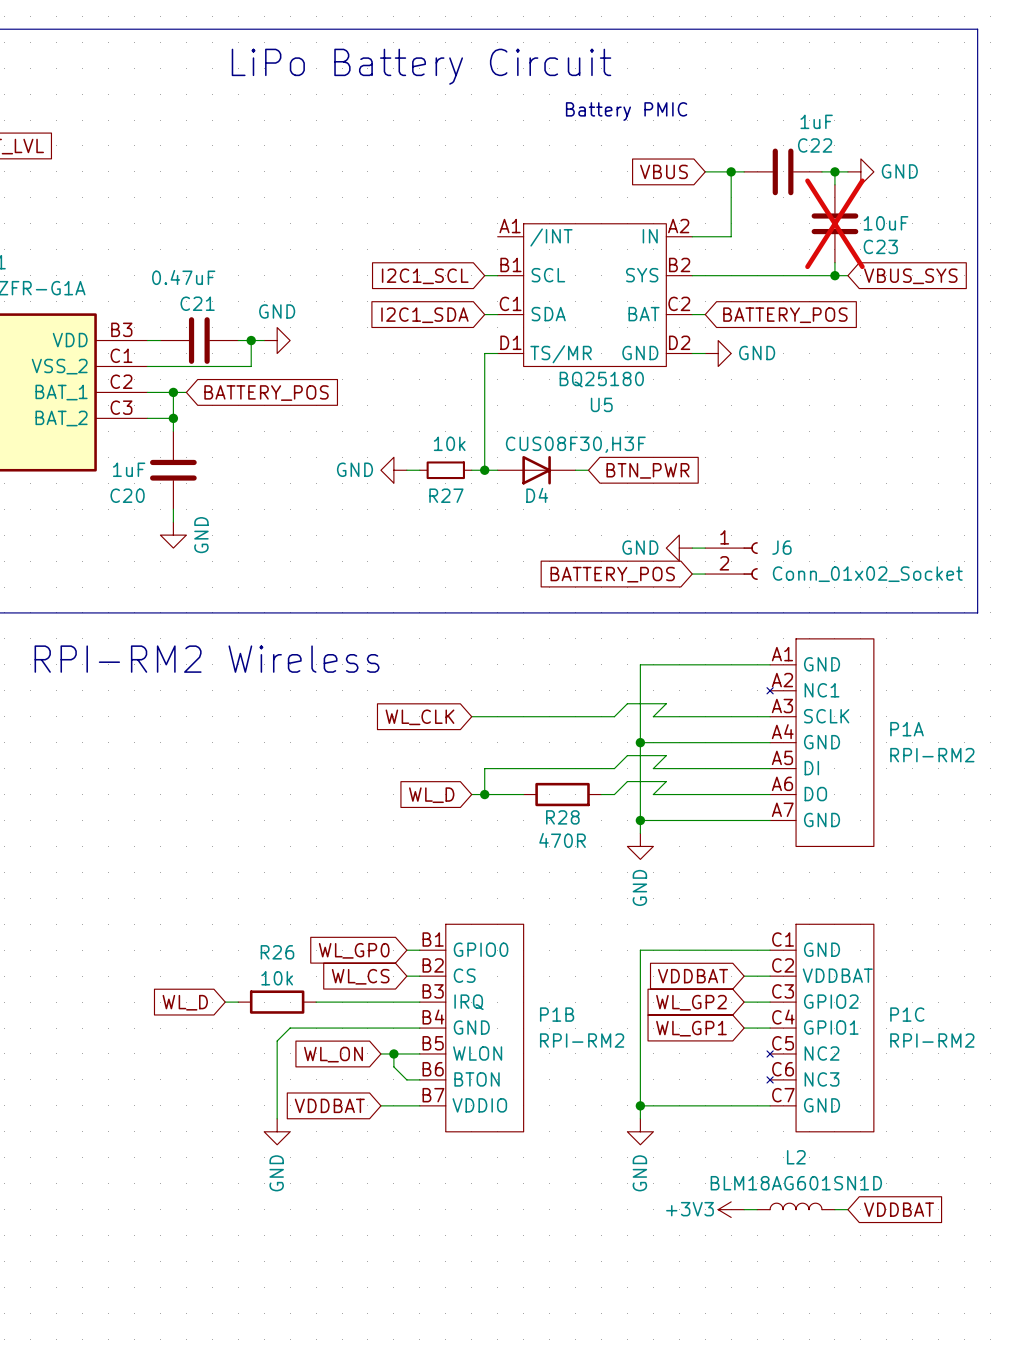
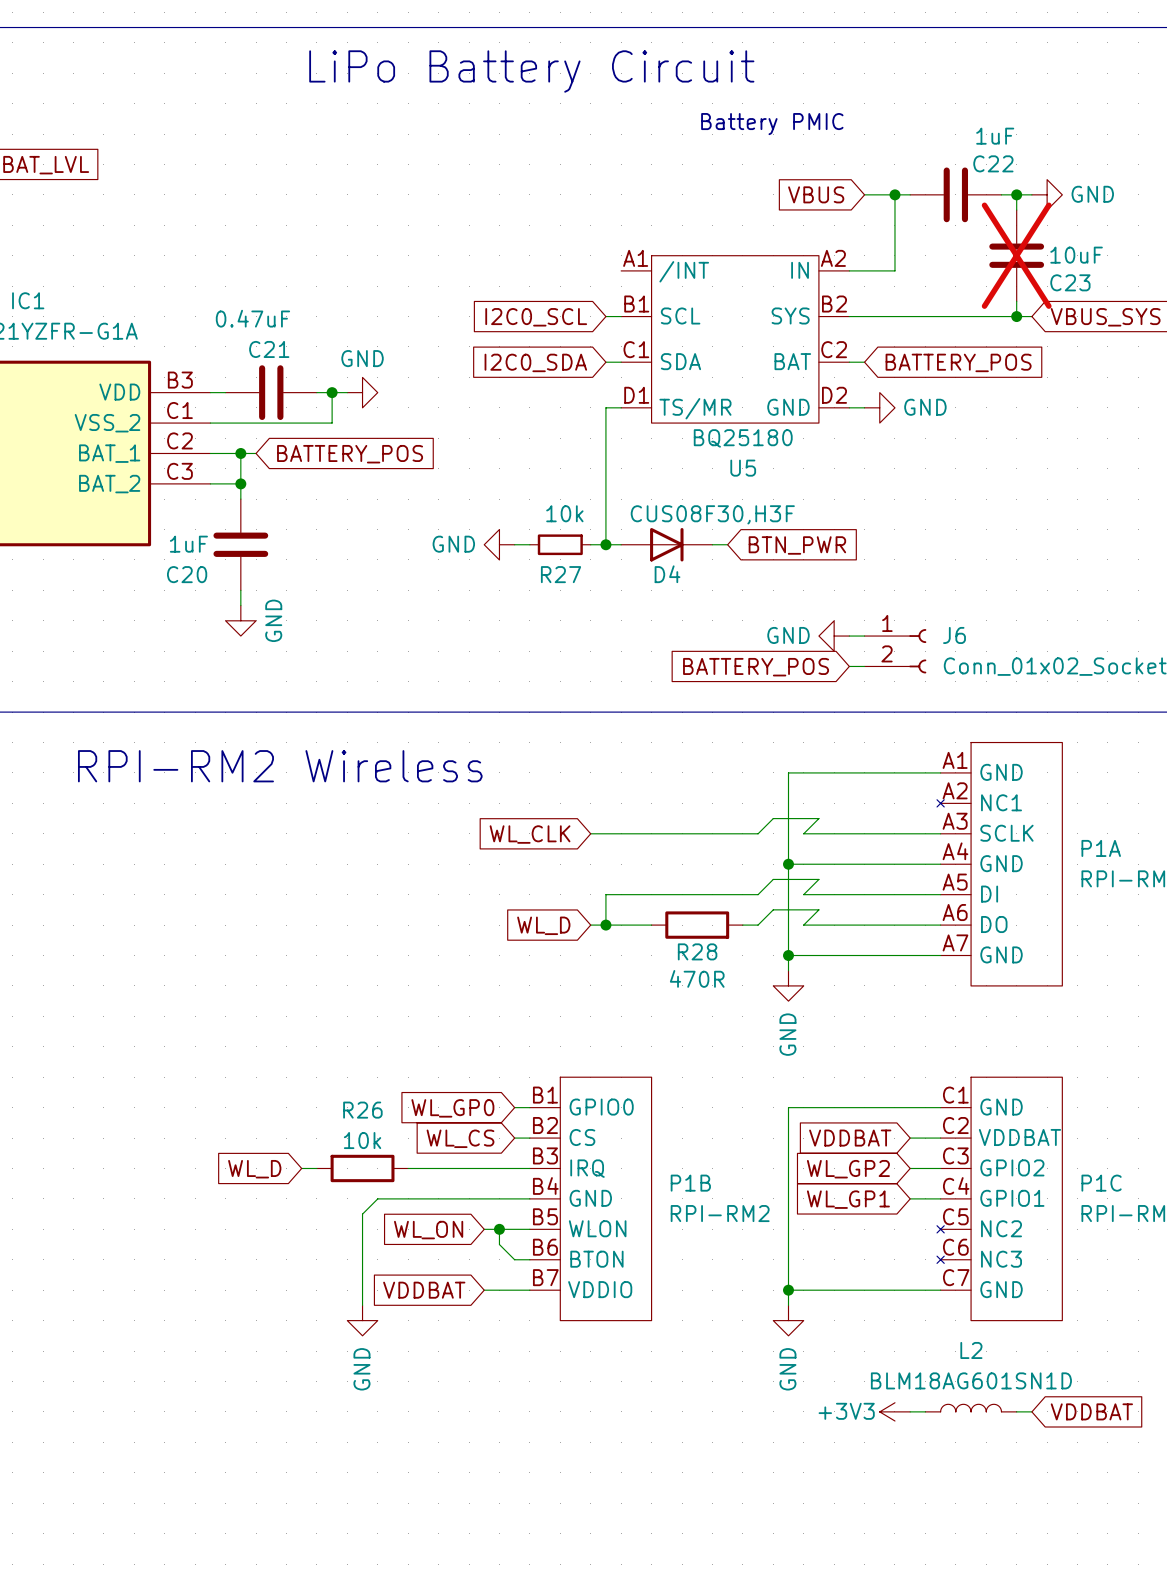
global label: I2C1_SCL (425, 276) -> I2C0_SCL (536, 317)
global label: I2C1_SDA (424, 315) -> I2C0_SDA (535, 362)

